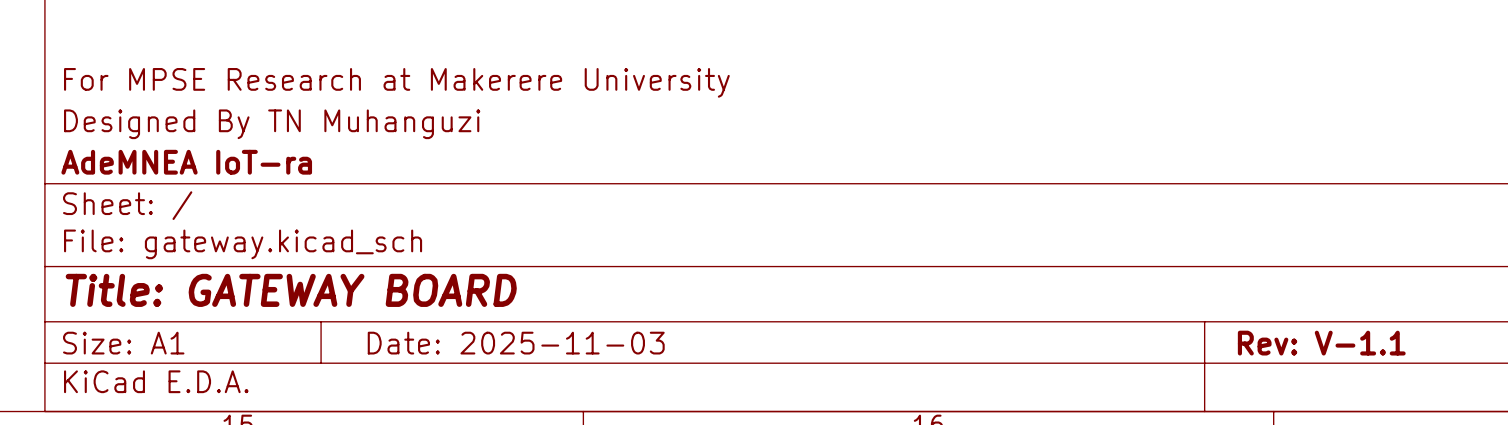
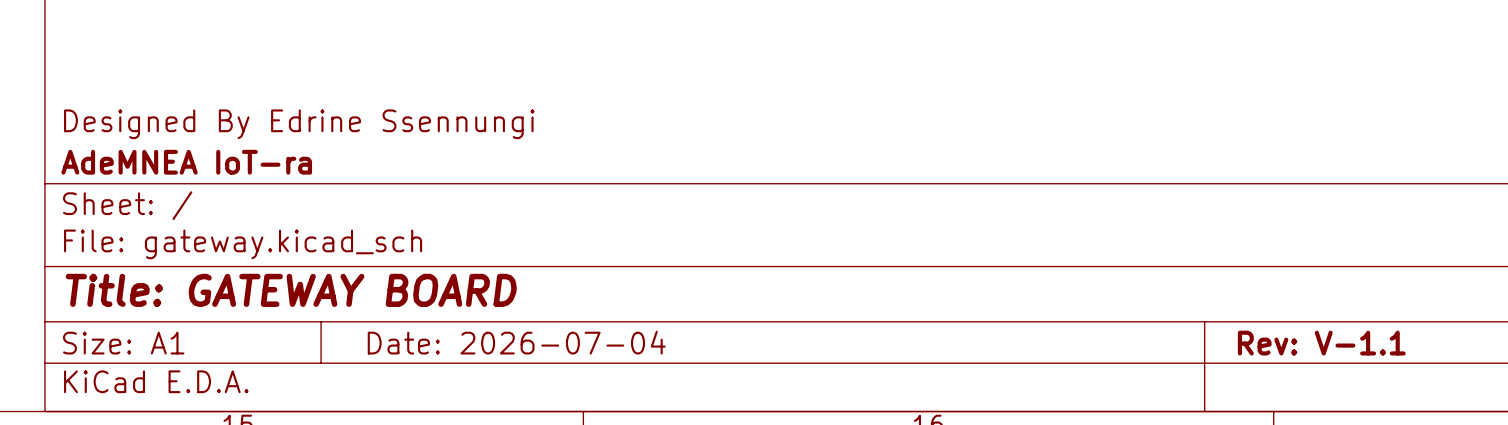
title block: For MPSE Research at Makerere University (396, 82) -> none
title block: Designed By TN Muhanguzi (272, 124) -> Designed By Edrine Ssennungi (299, 124)
title block: Date: 2025-11-03 (516, 343) -> Date: 2026-07-04 (516, 342)

